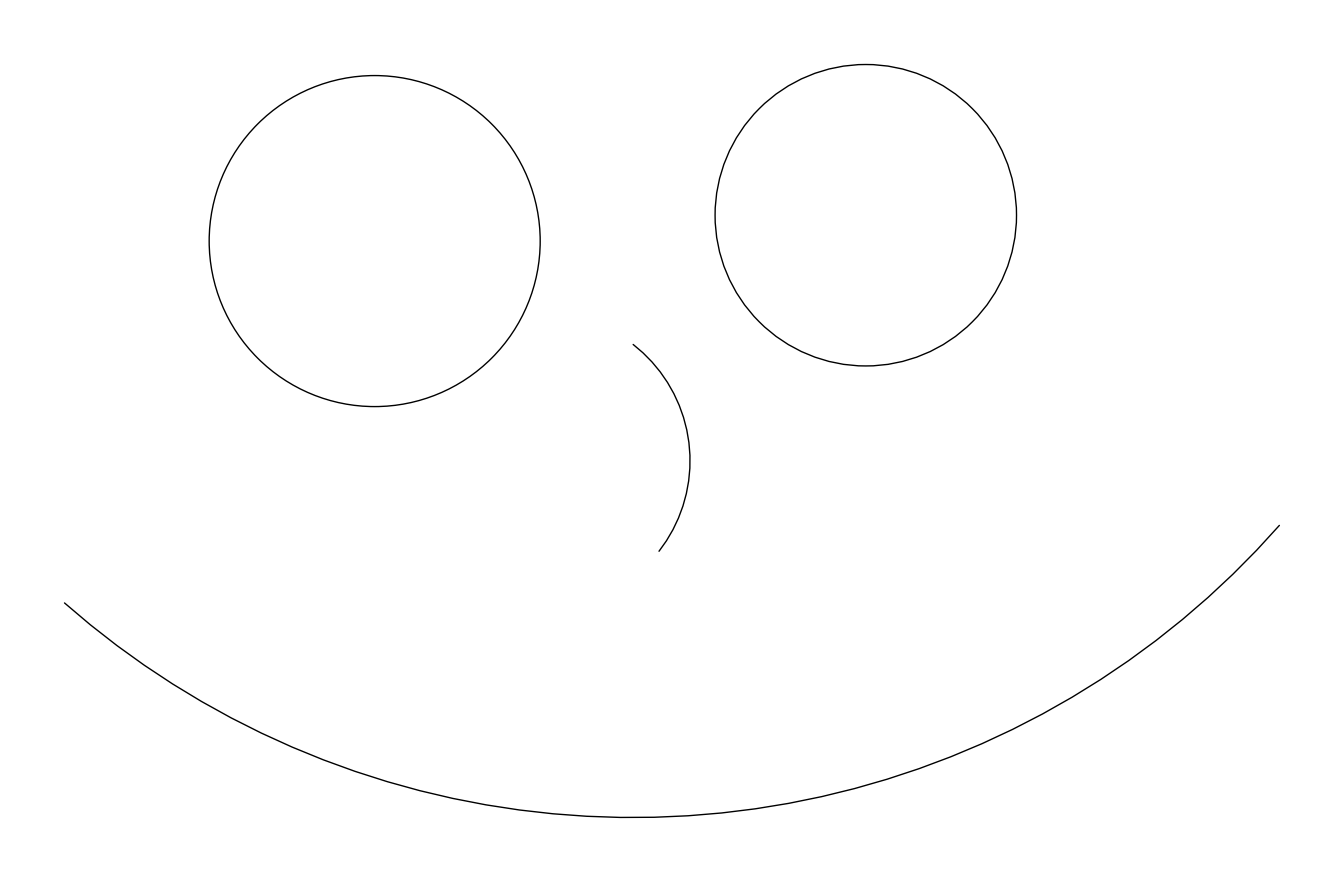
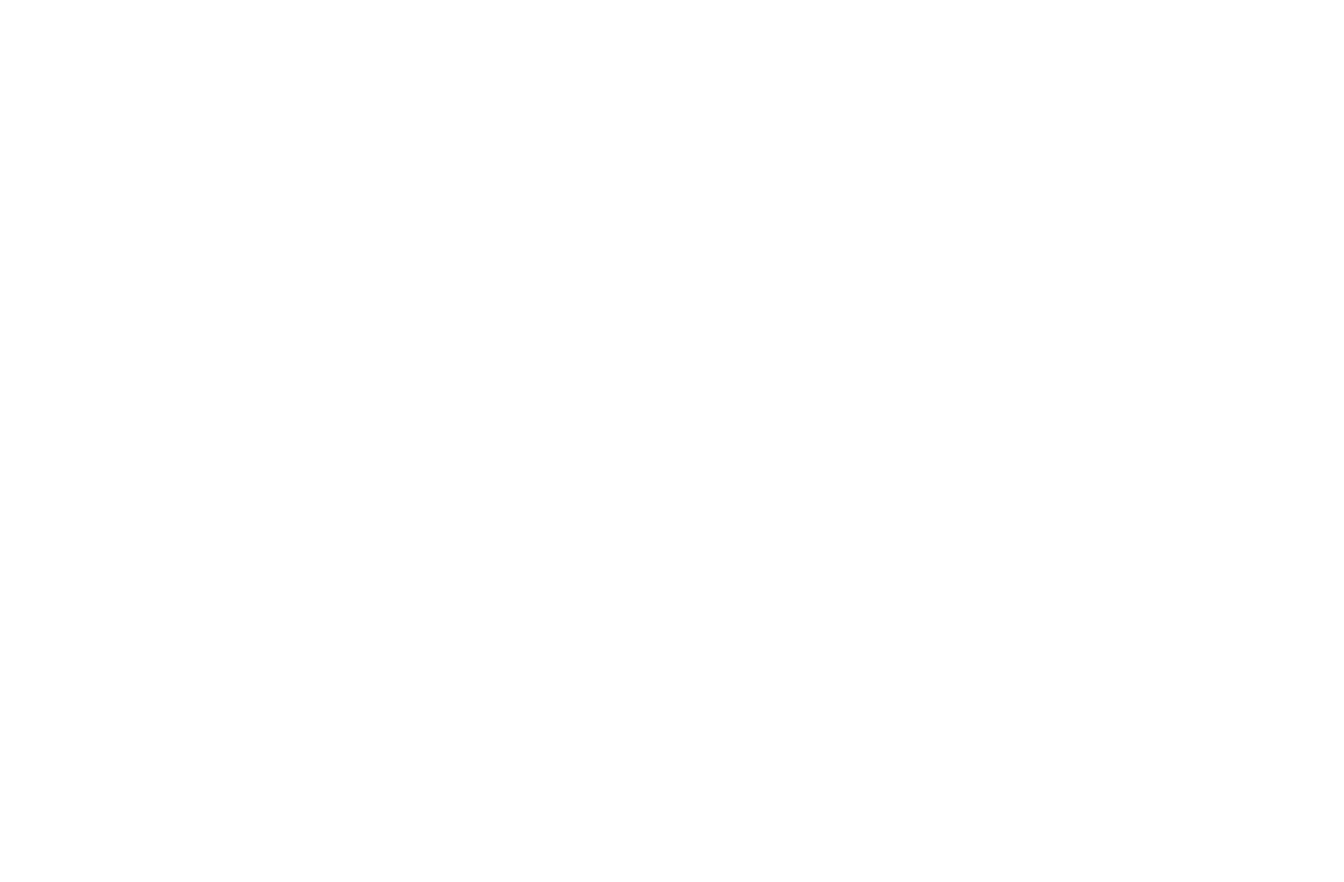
drawing: [715, 64, 1017, 366] -> none
drawing: [209, 75, 541, 407] -> none
line: (633, 344) (651, 361) (667, 382) (679, 405) (688, 442) (689, 468) (682, 506) (672, 529) (659, 551) -> none
line: (1279, 525) (1208, 597) (1156, 640) (1072, 697) (1012, 729) (950, 756) (854, 788) (788, 803) (687, 815) (586, 816) (519, 809) (452, 798) (355, 771) (261, 733) (201, 701) (144, 665) (64, 602) -> none

